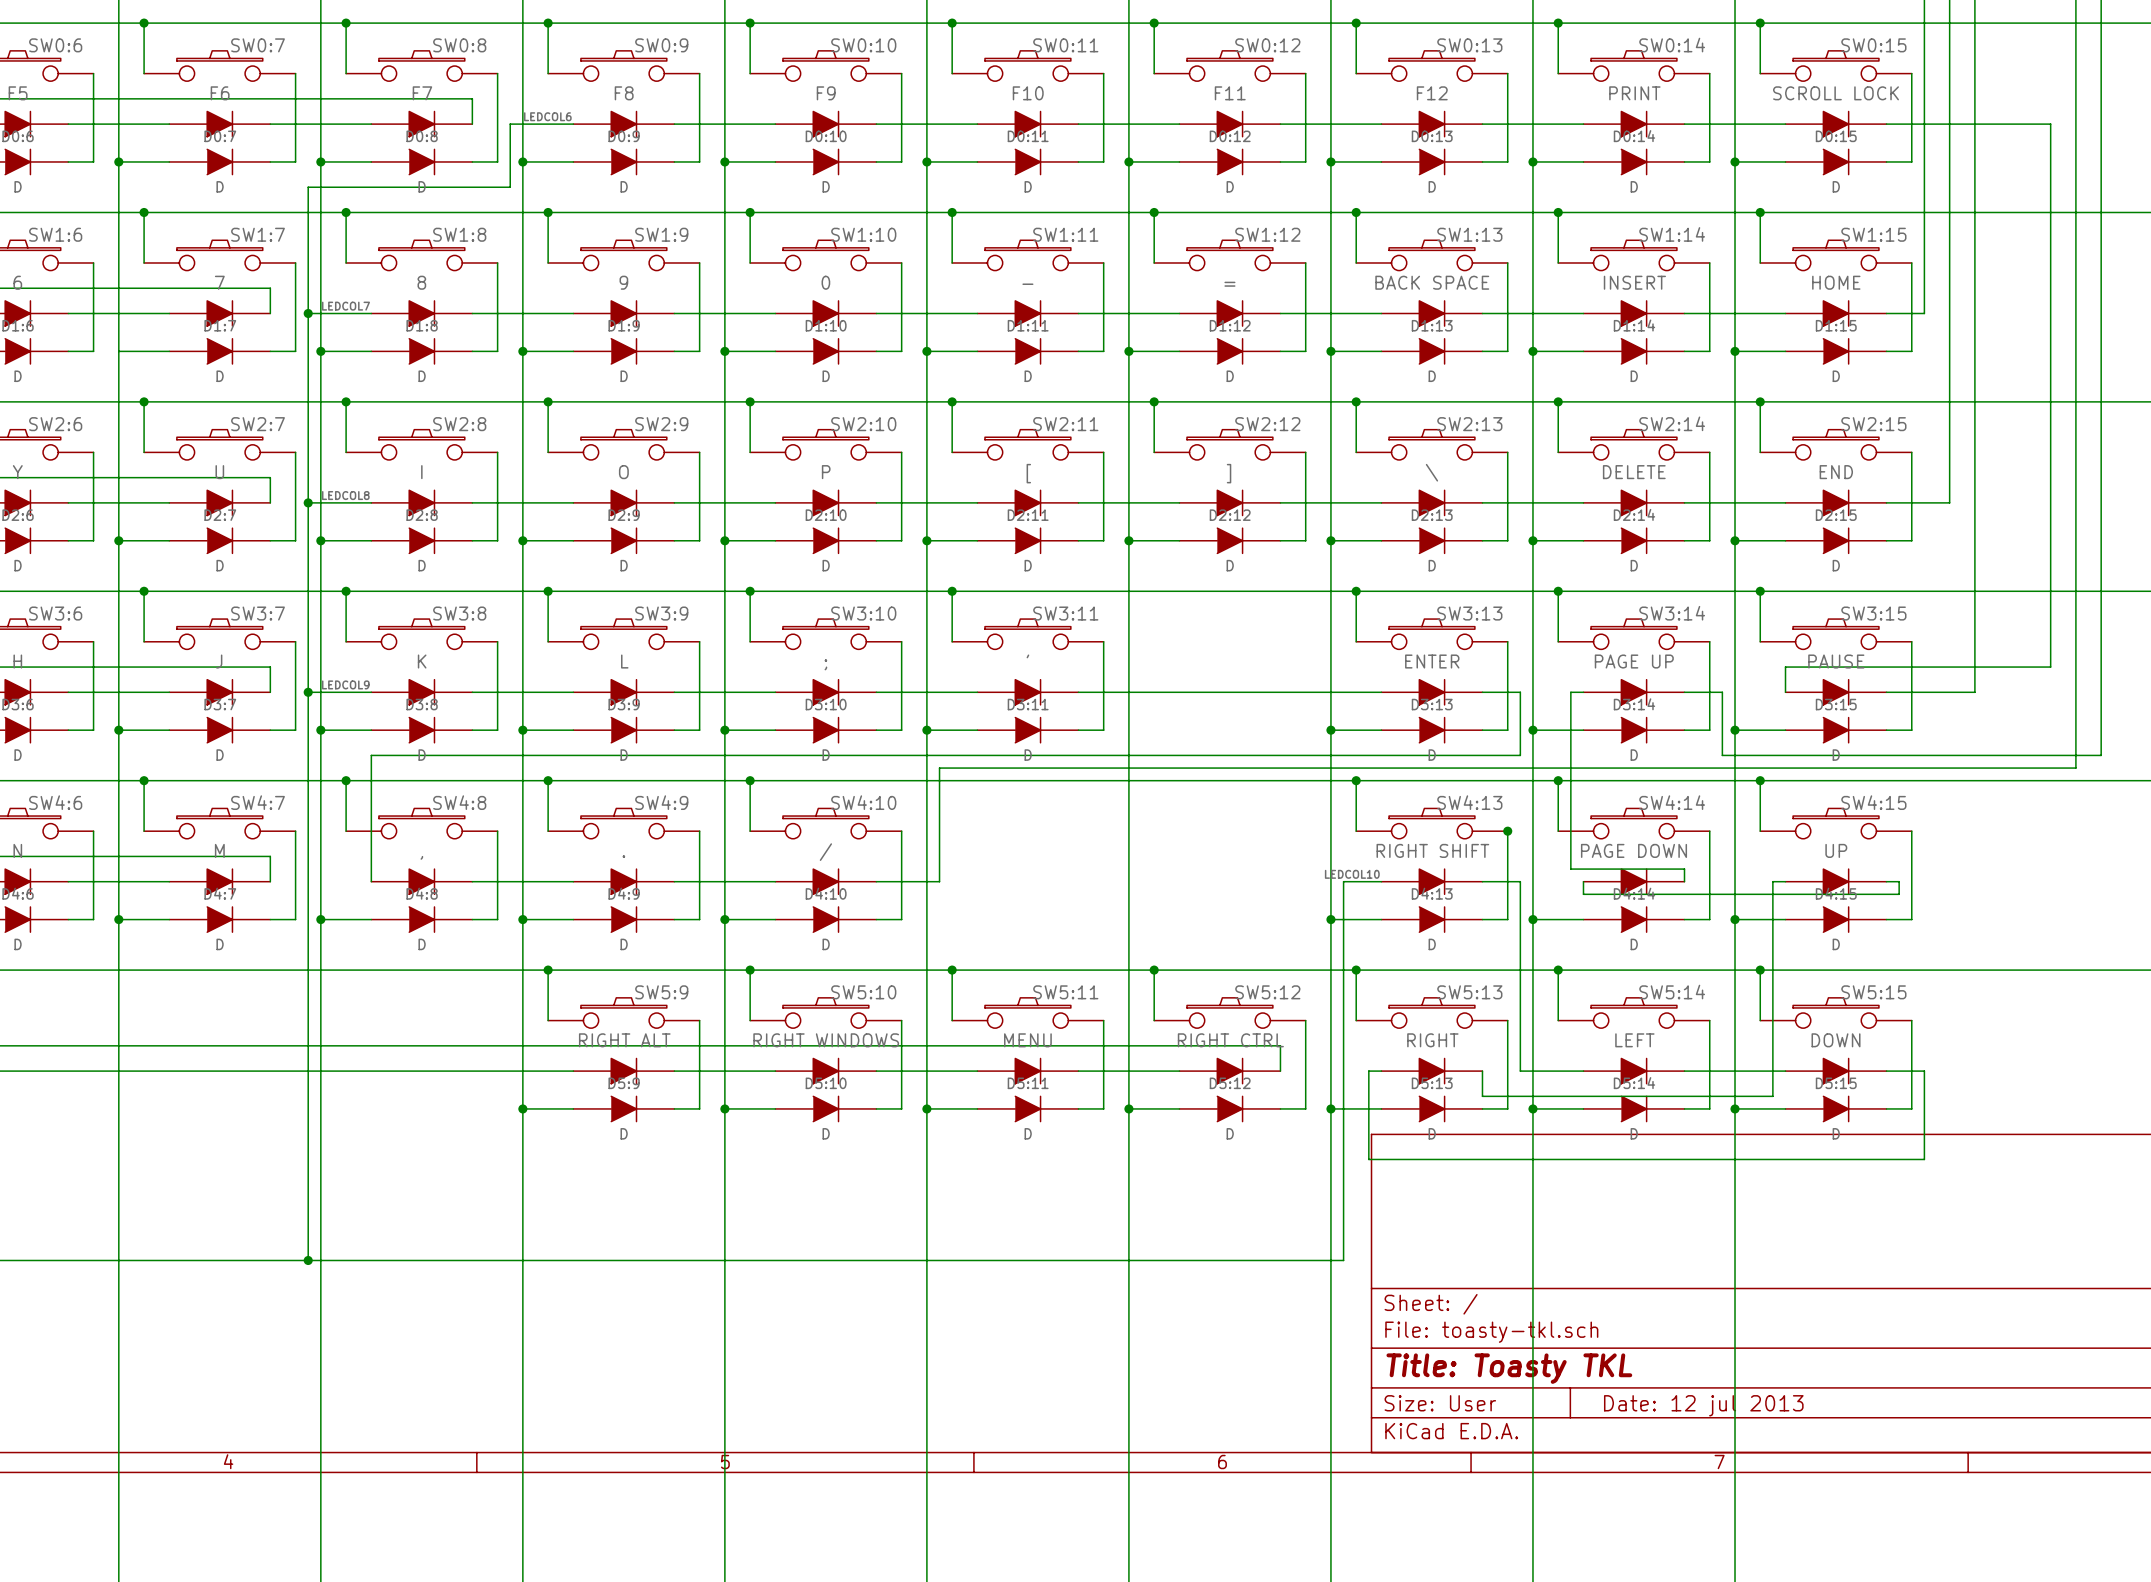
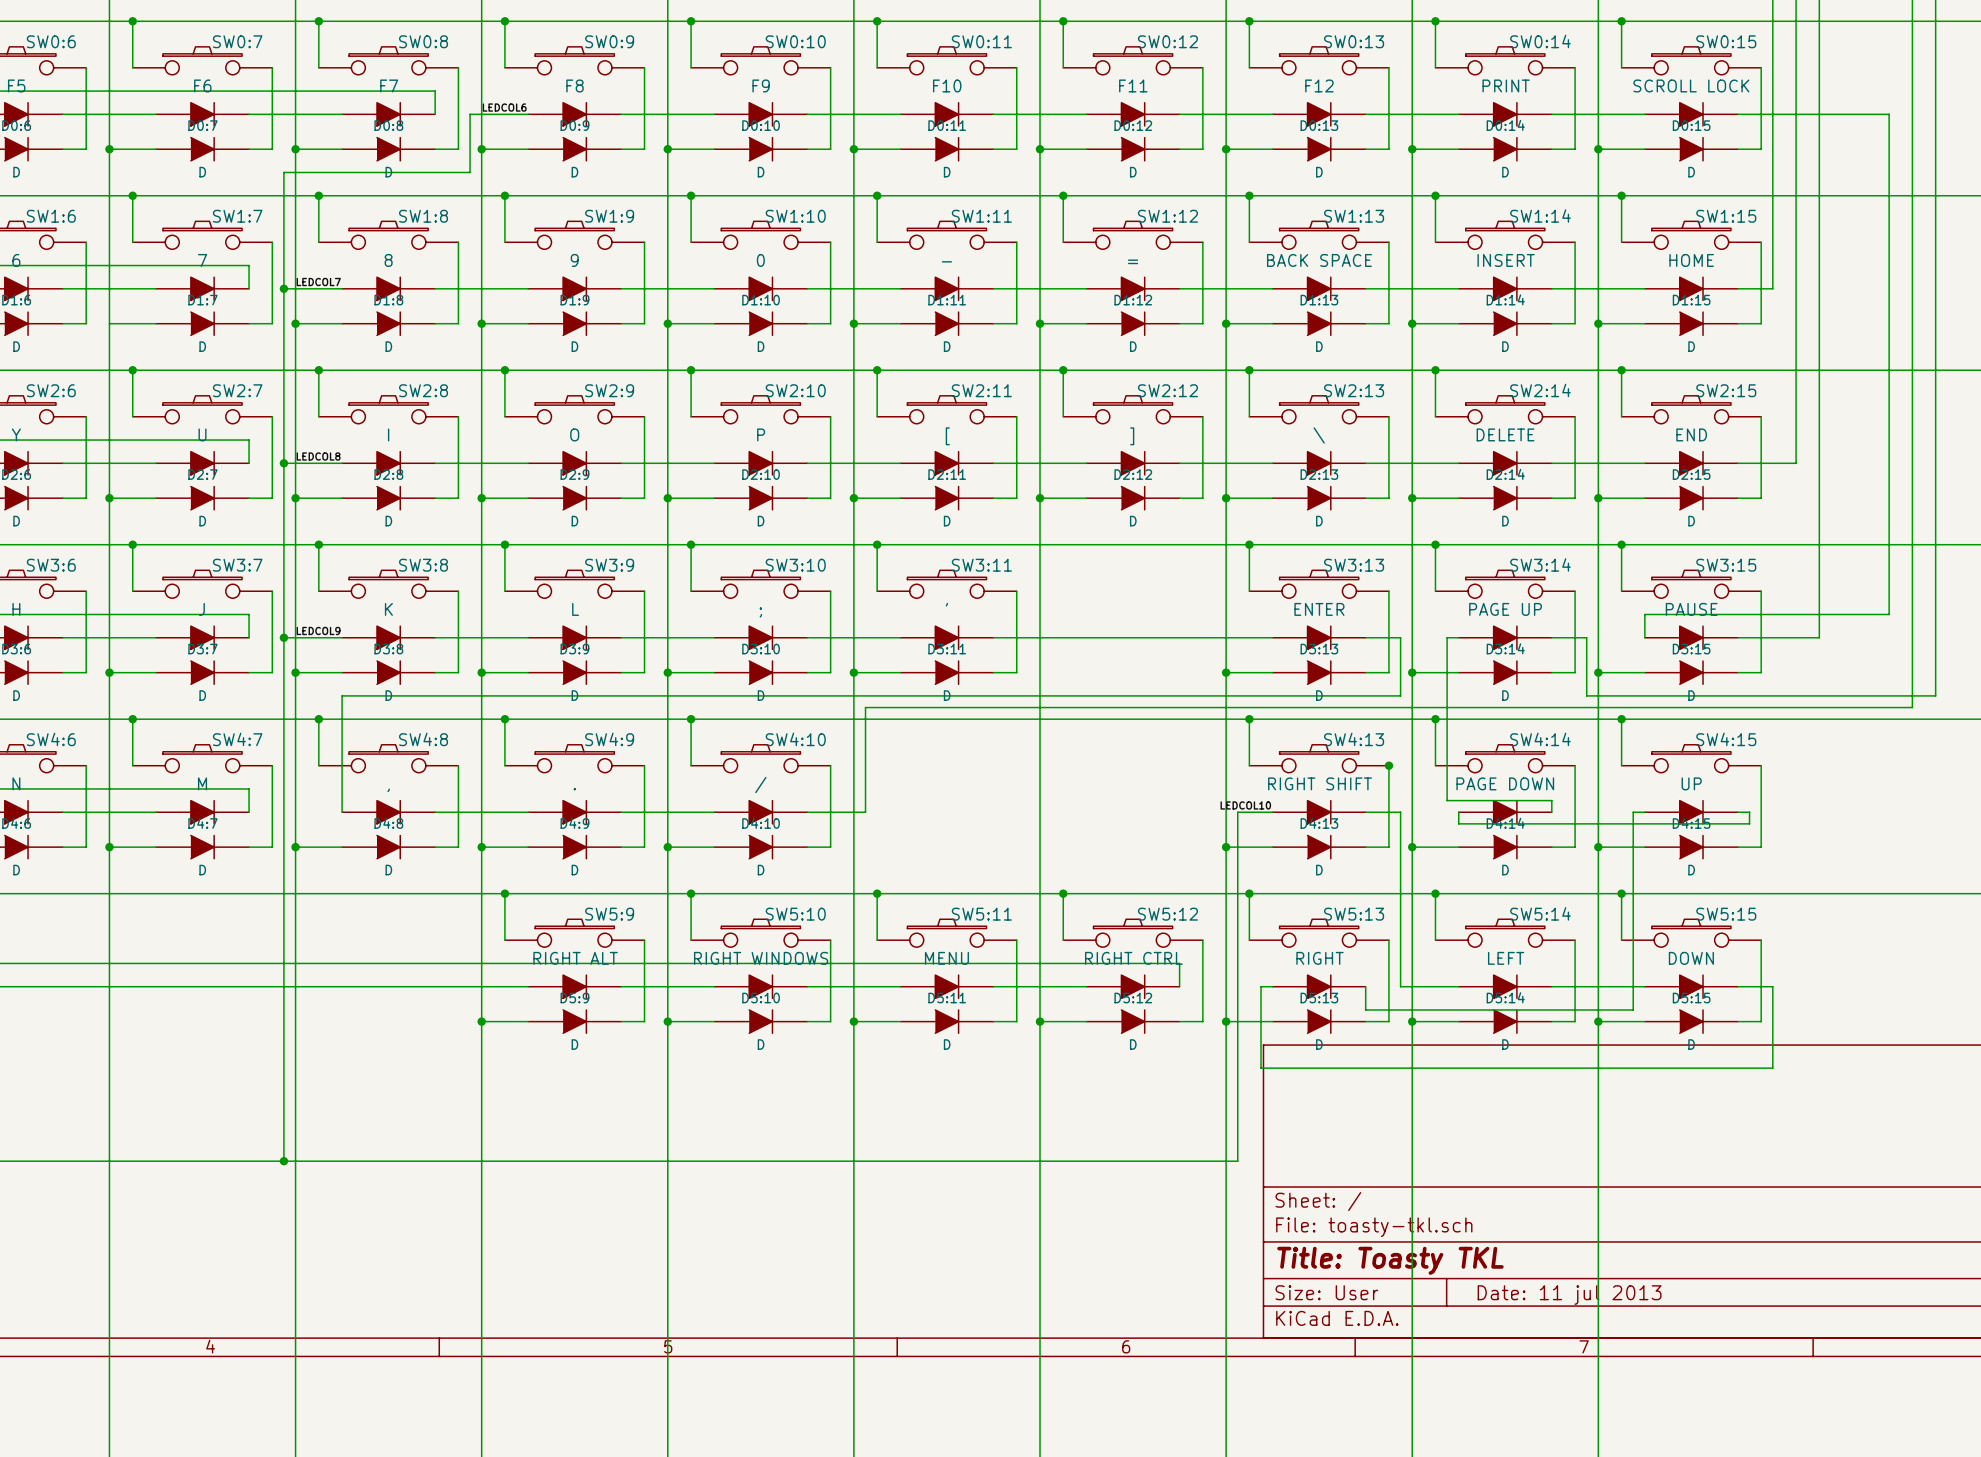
title block: Date: 12 jul 2013 (1703, 1405) -> Date: 11 jul 2013 (1569, 1295)

